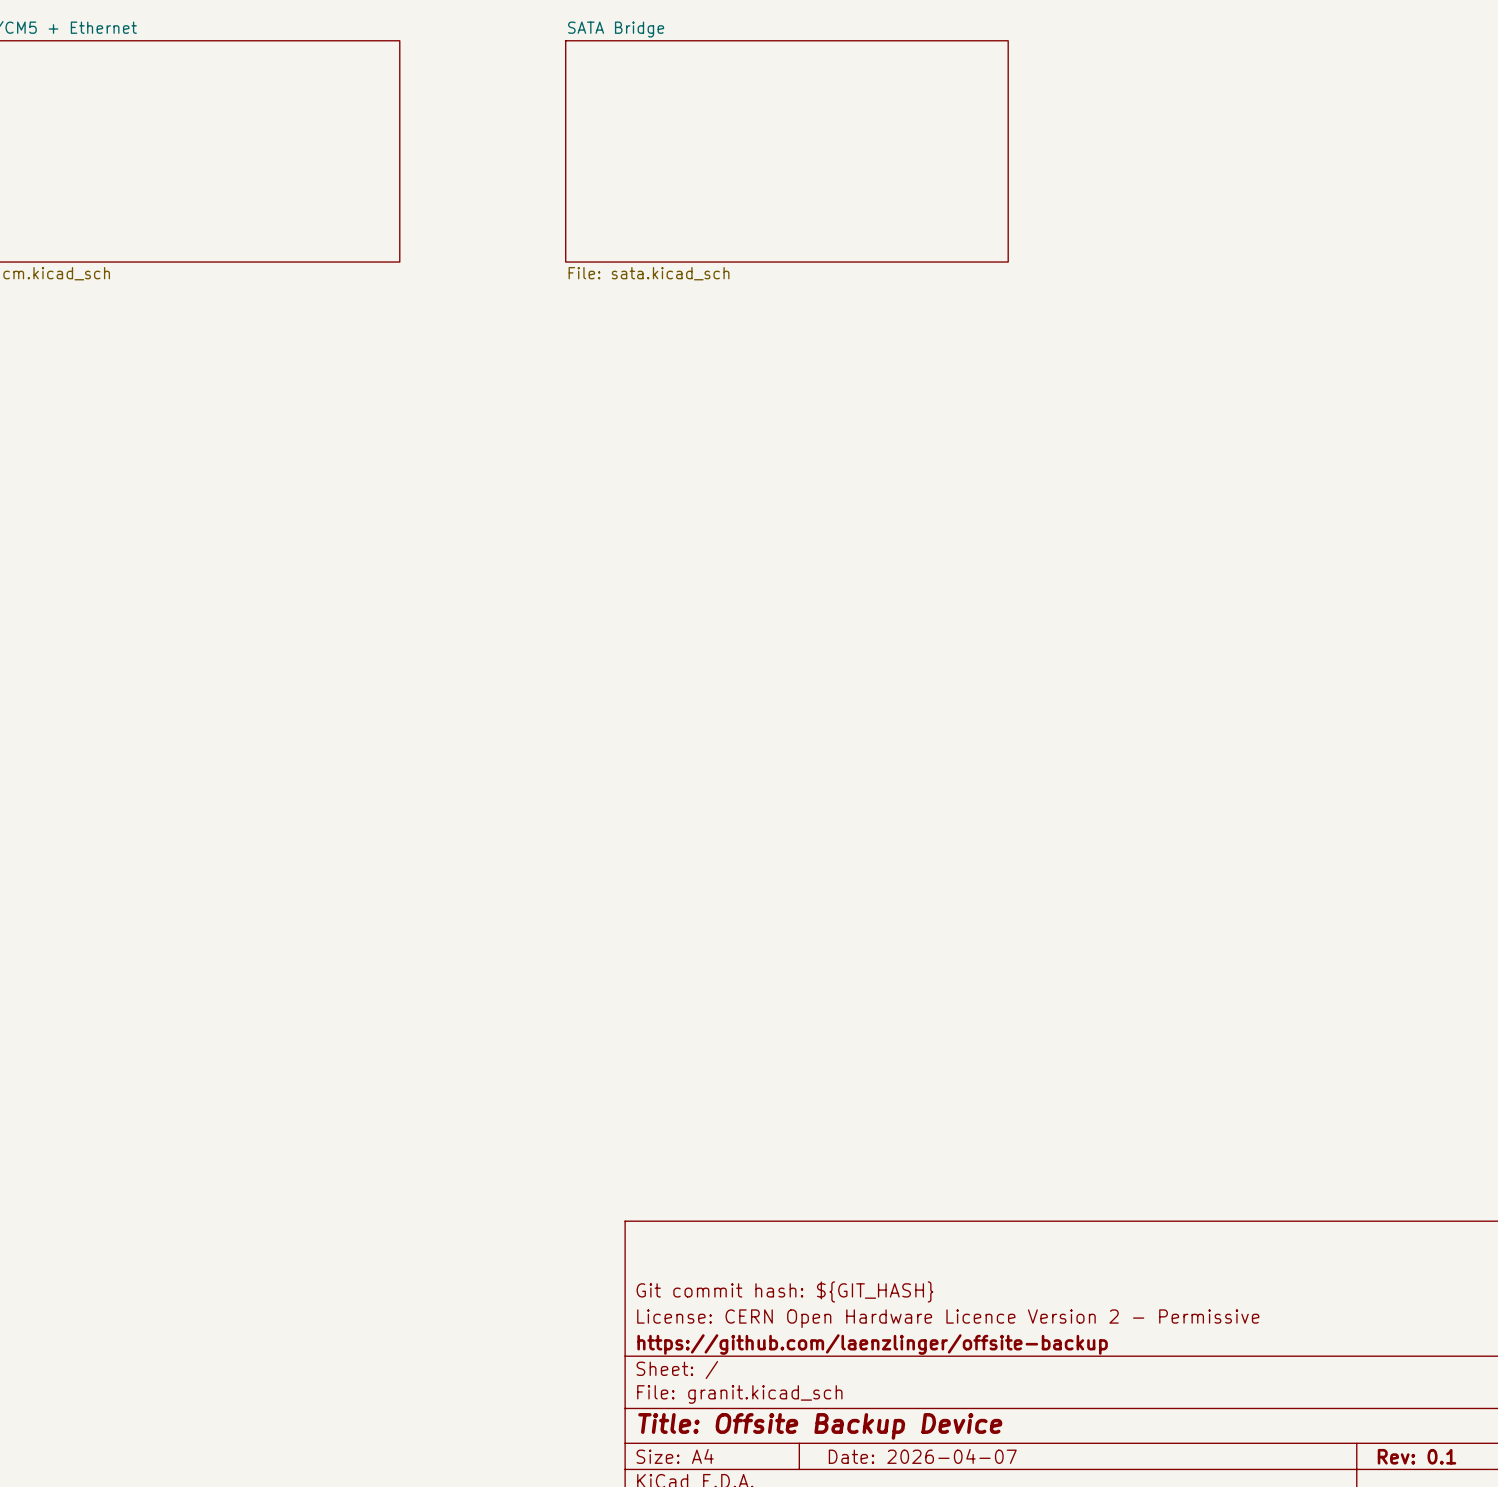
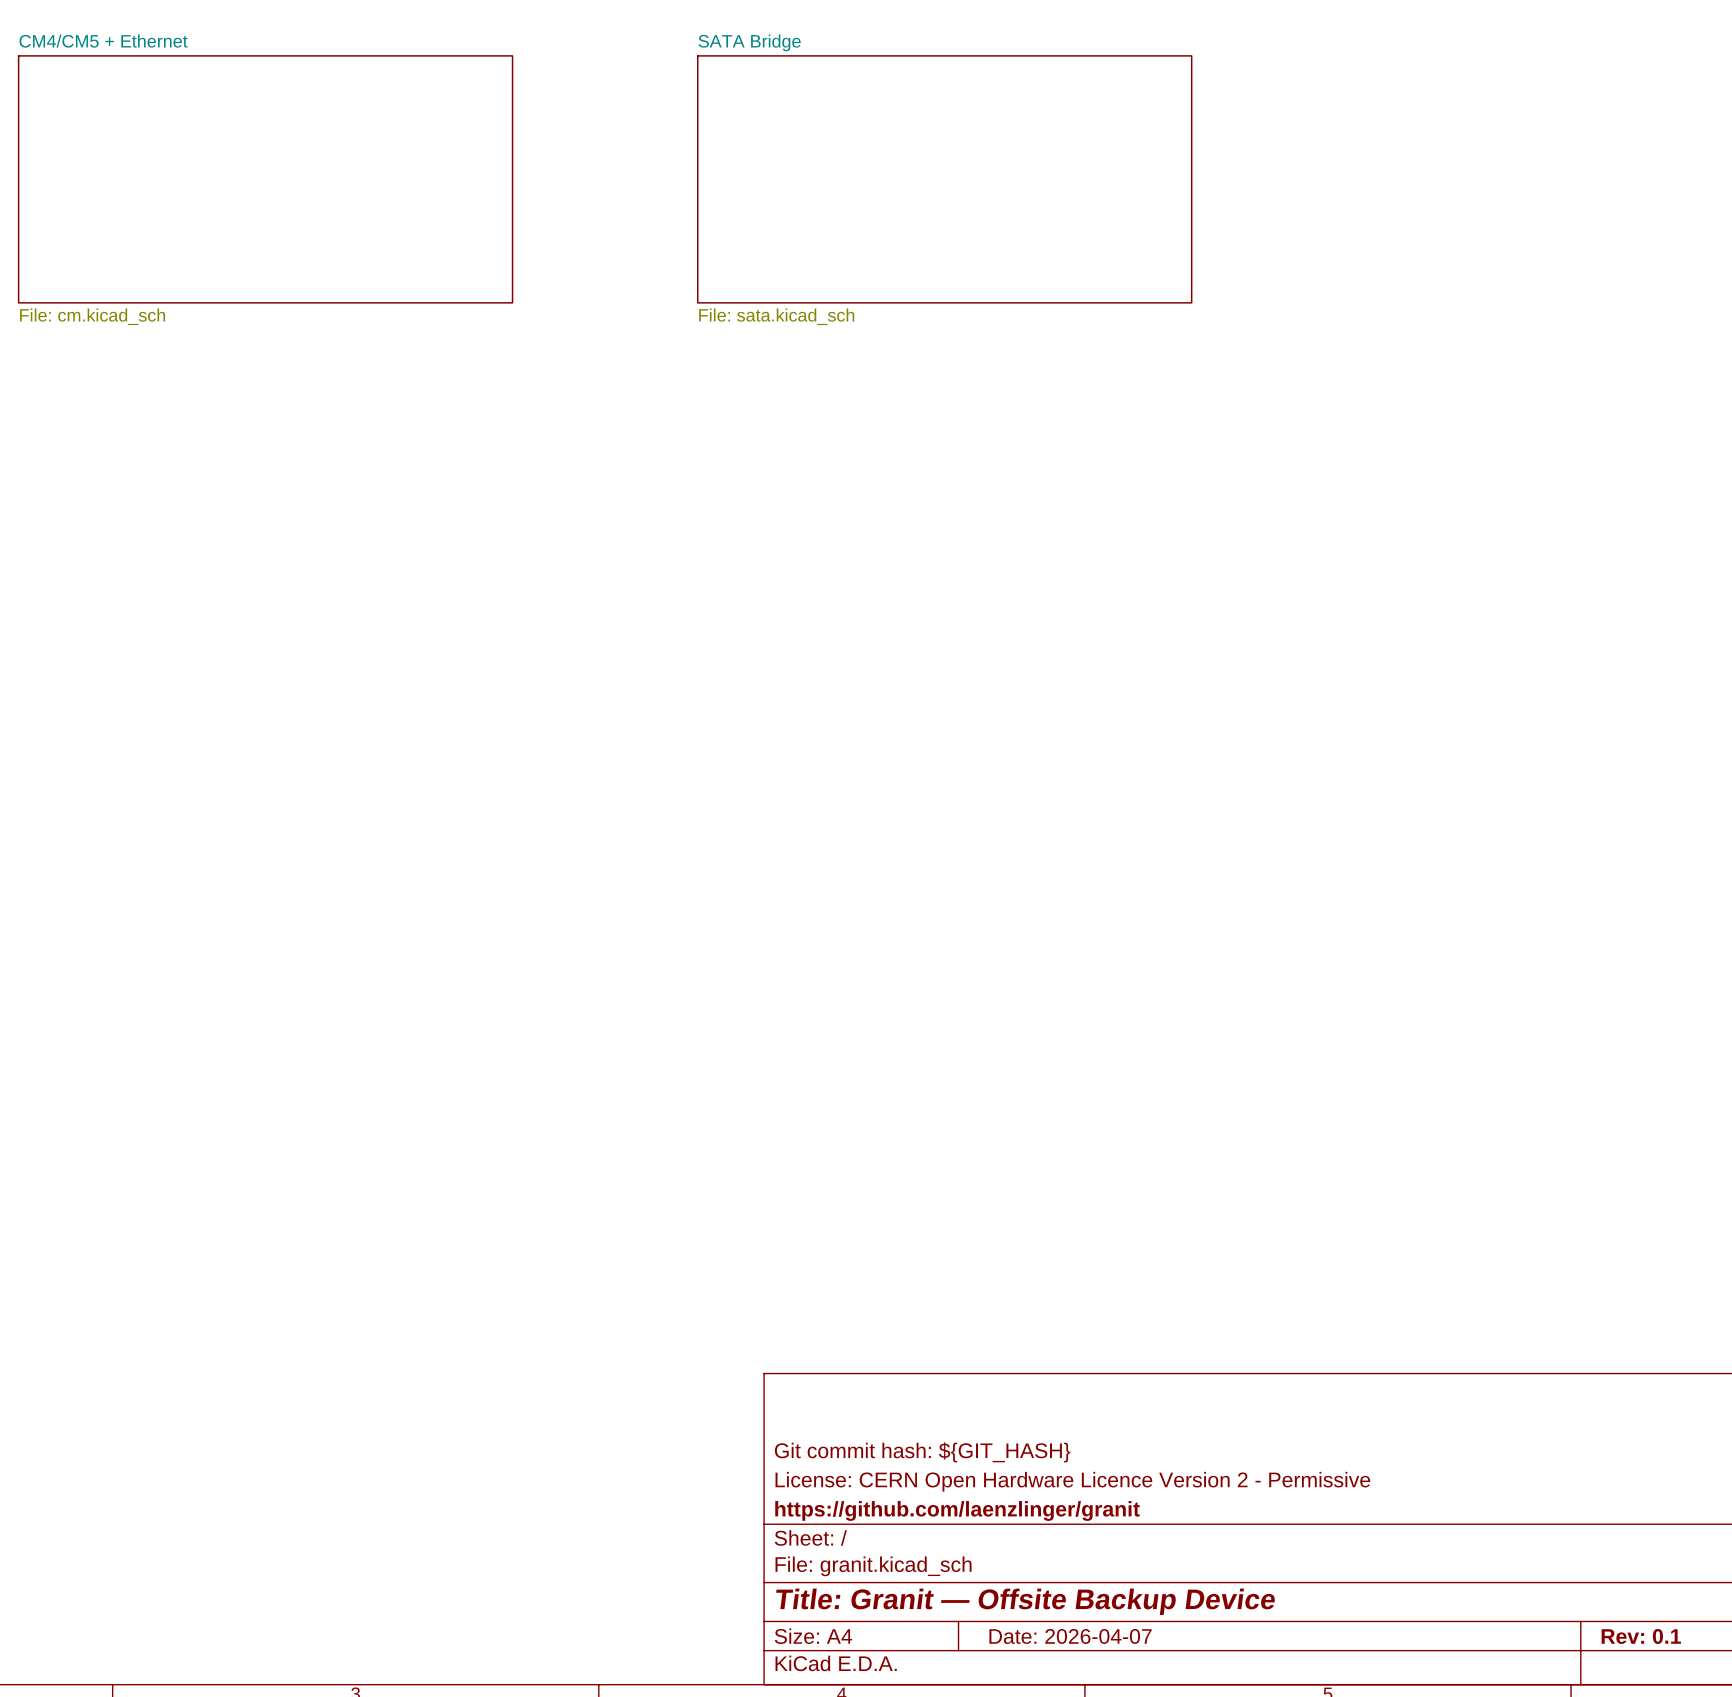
title block: https://github.com/laenzlinger/offsite-backup (872, 1344) -> https://github.com/laenzlinger/granit (957, 1510)
title block: Title: Offsite Backup Device (820, 1426) -> Title: Granit — Offsite Backup Device (1025, 1601)

